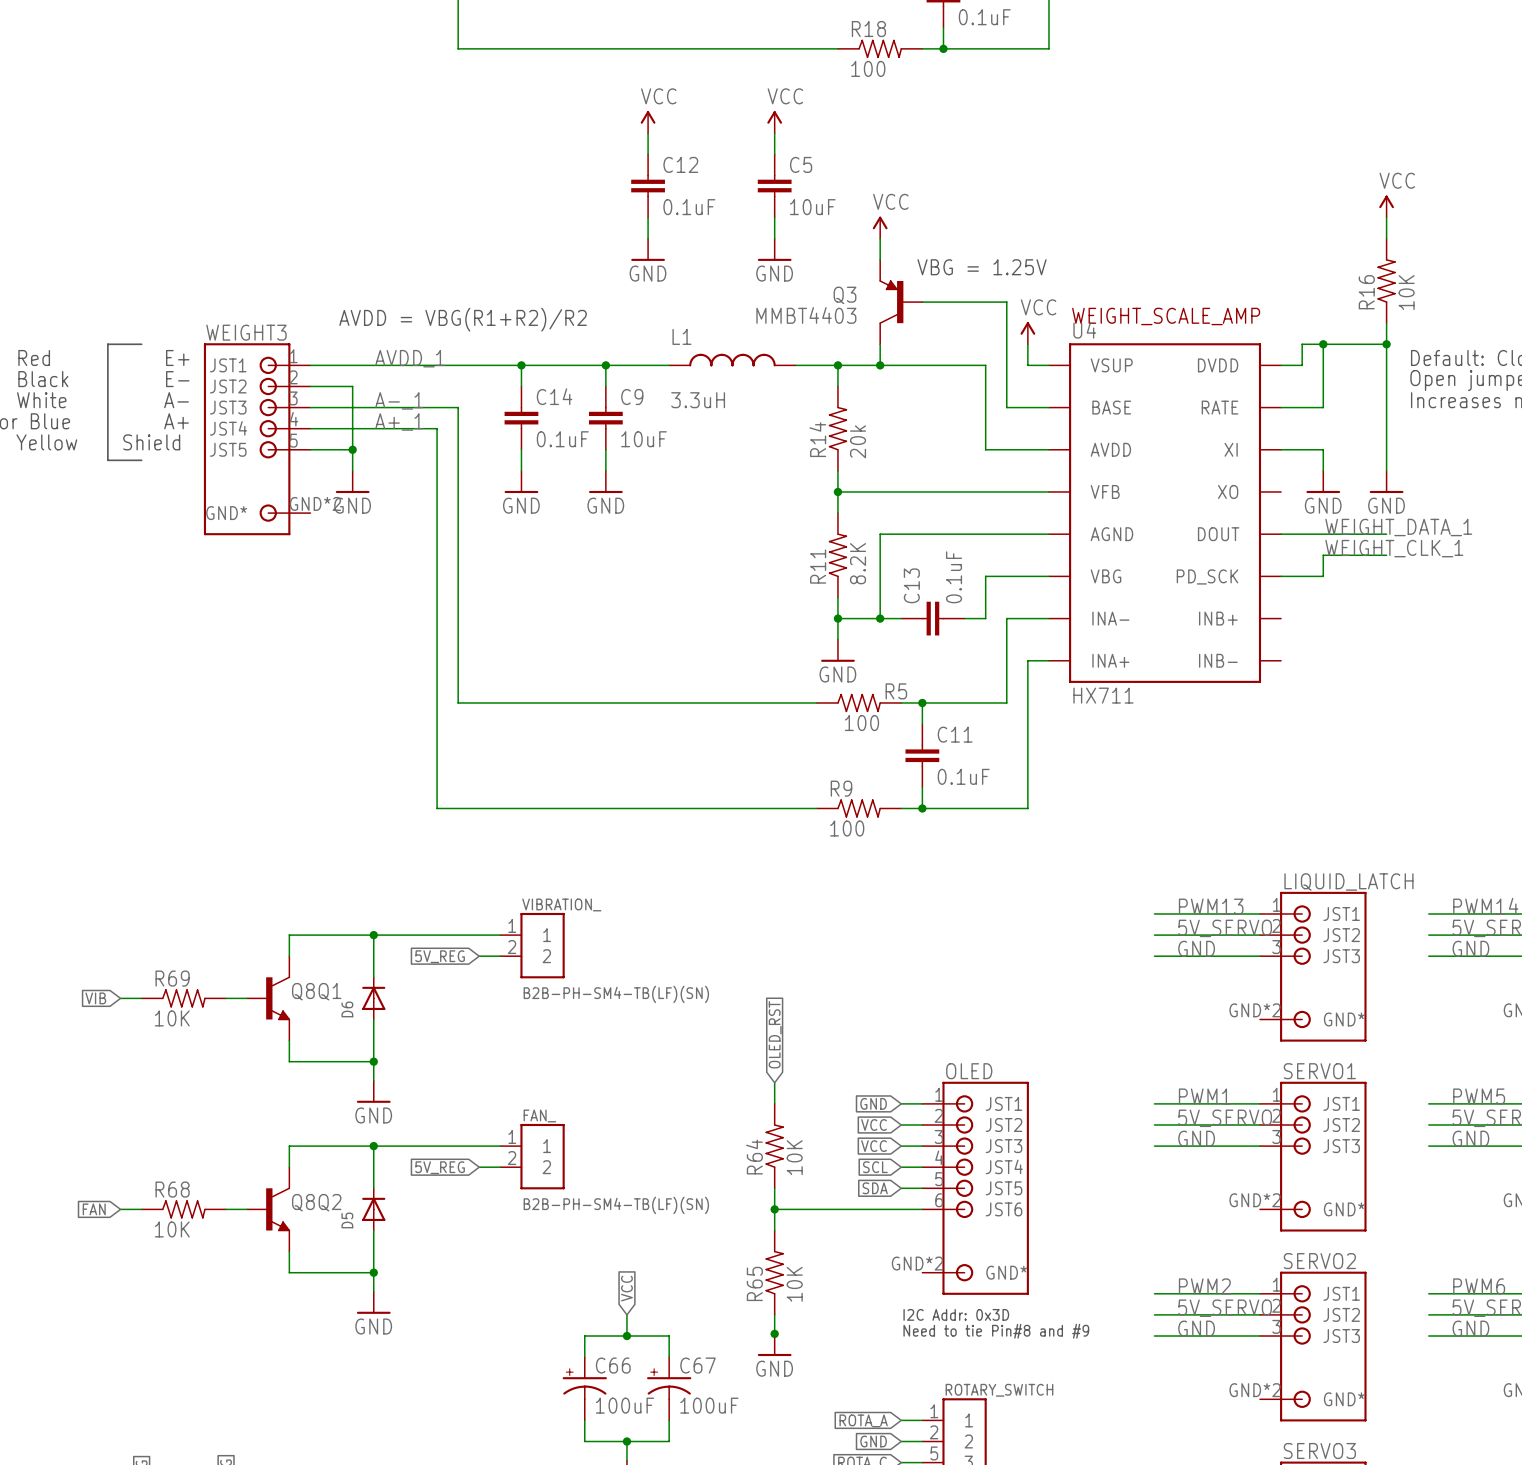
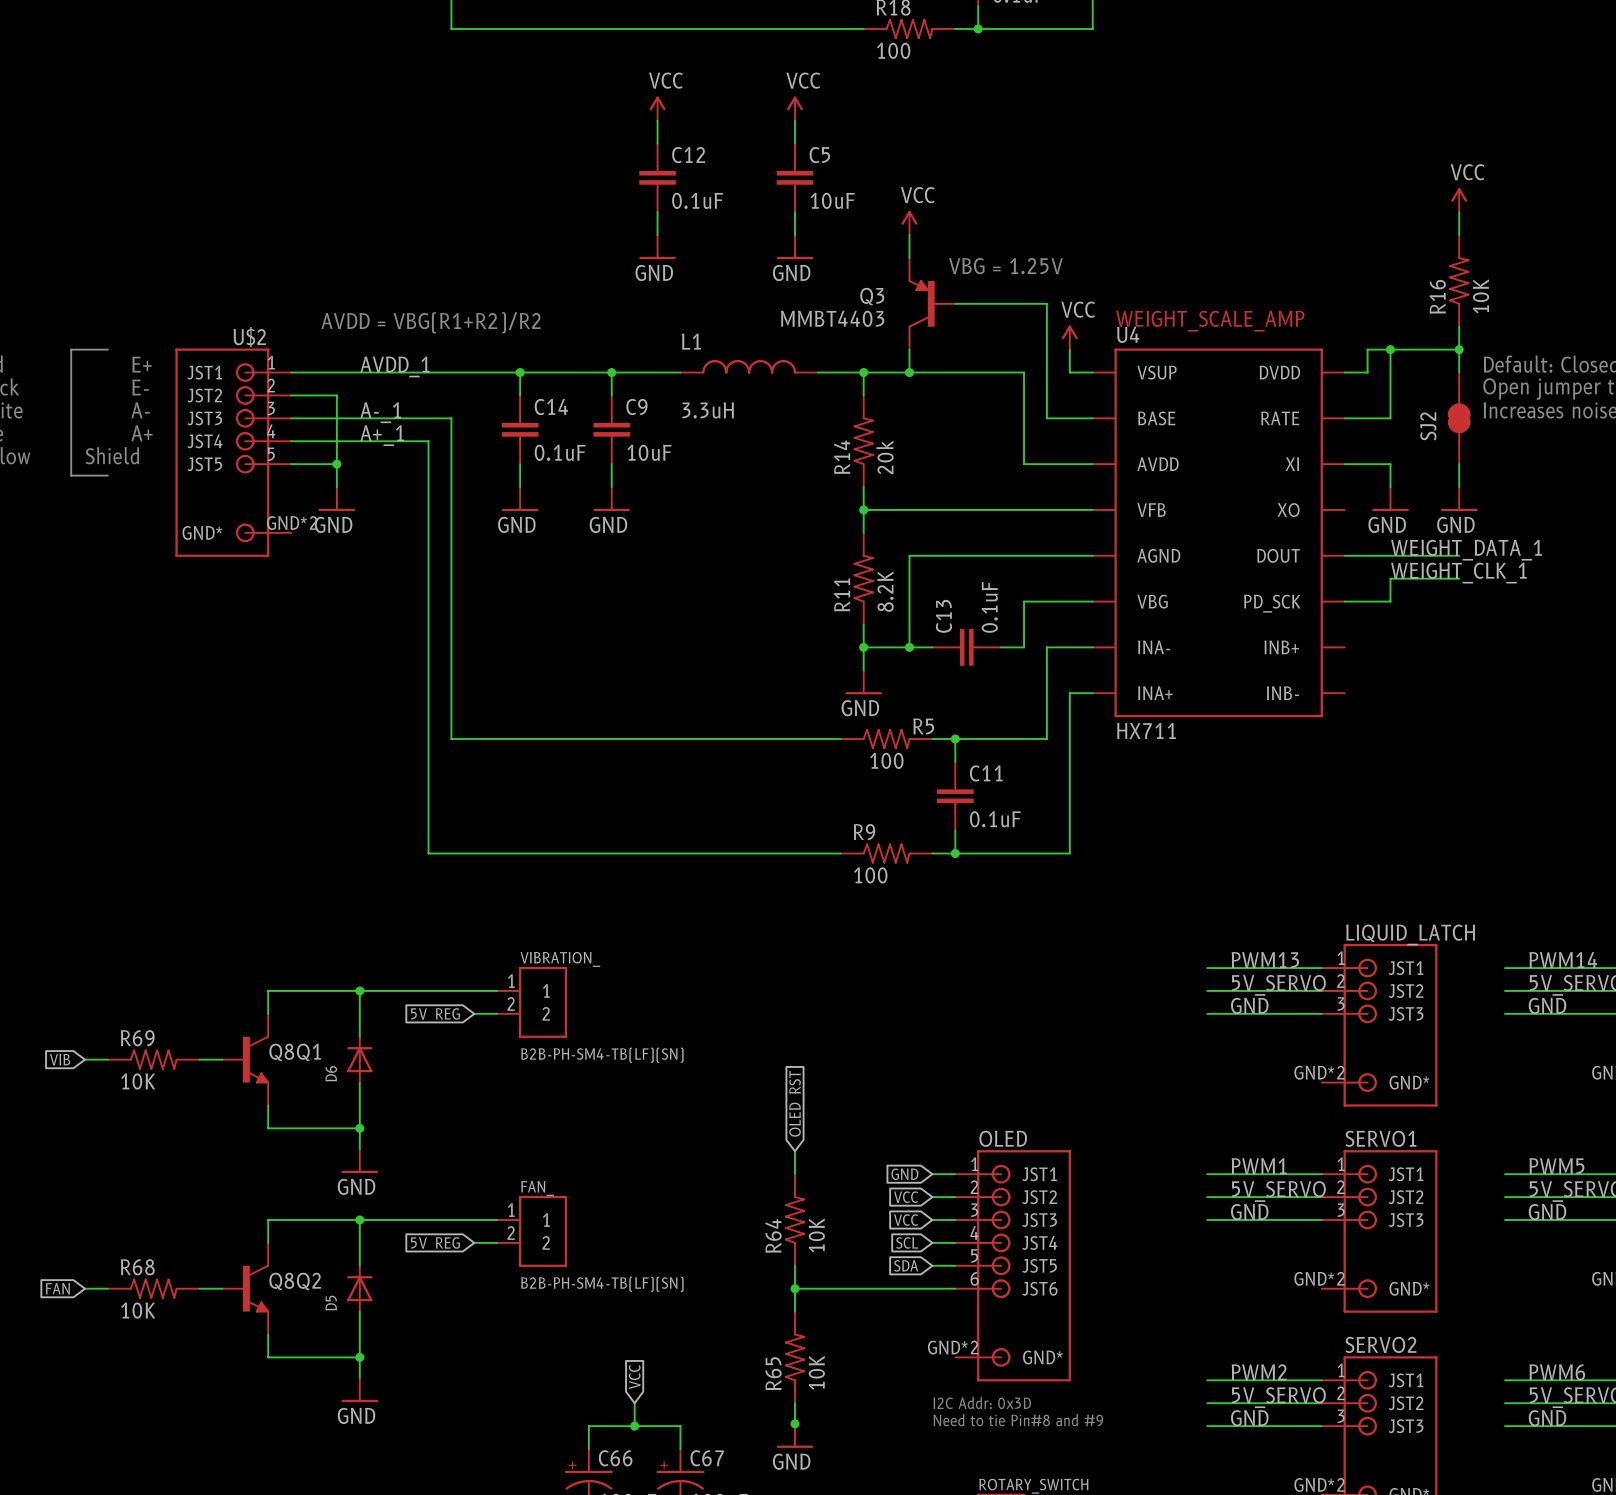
WEIGHT3 name: WEIGHT3 (246, 332) -> U$2 (249, 337)
SJ2: none -> (1459, 418)

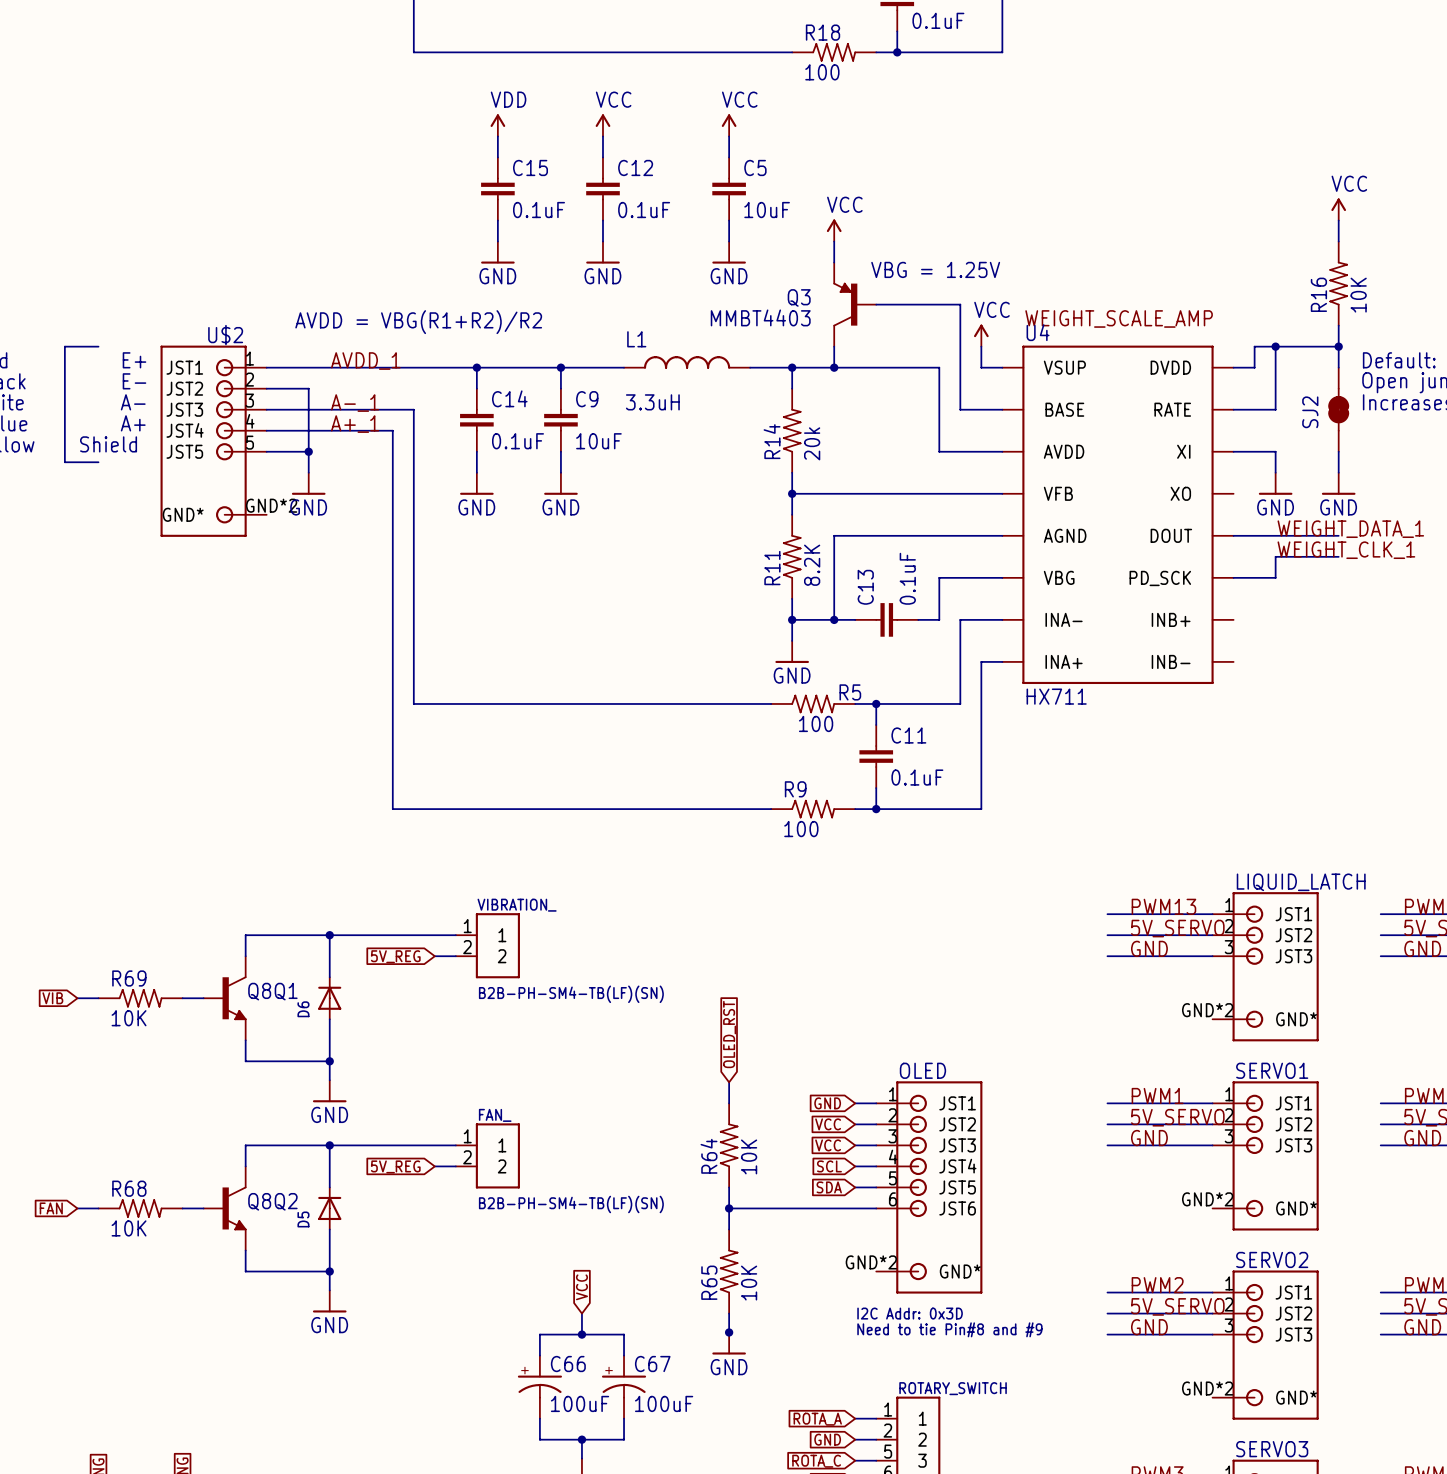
power symbol: none -> VDD (497, 125)
wire: none -> (497, 136) (497, 157)
C15: none -> 0.1uF (497, 189)
wire: none -> (497, 220) (497, 241)
power symbol: none -> GND (497, 252)

